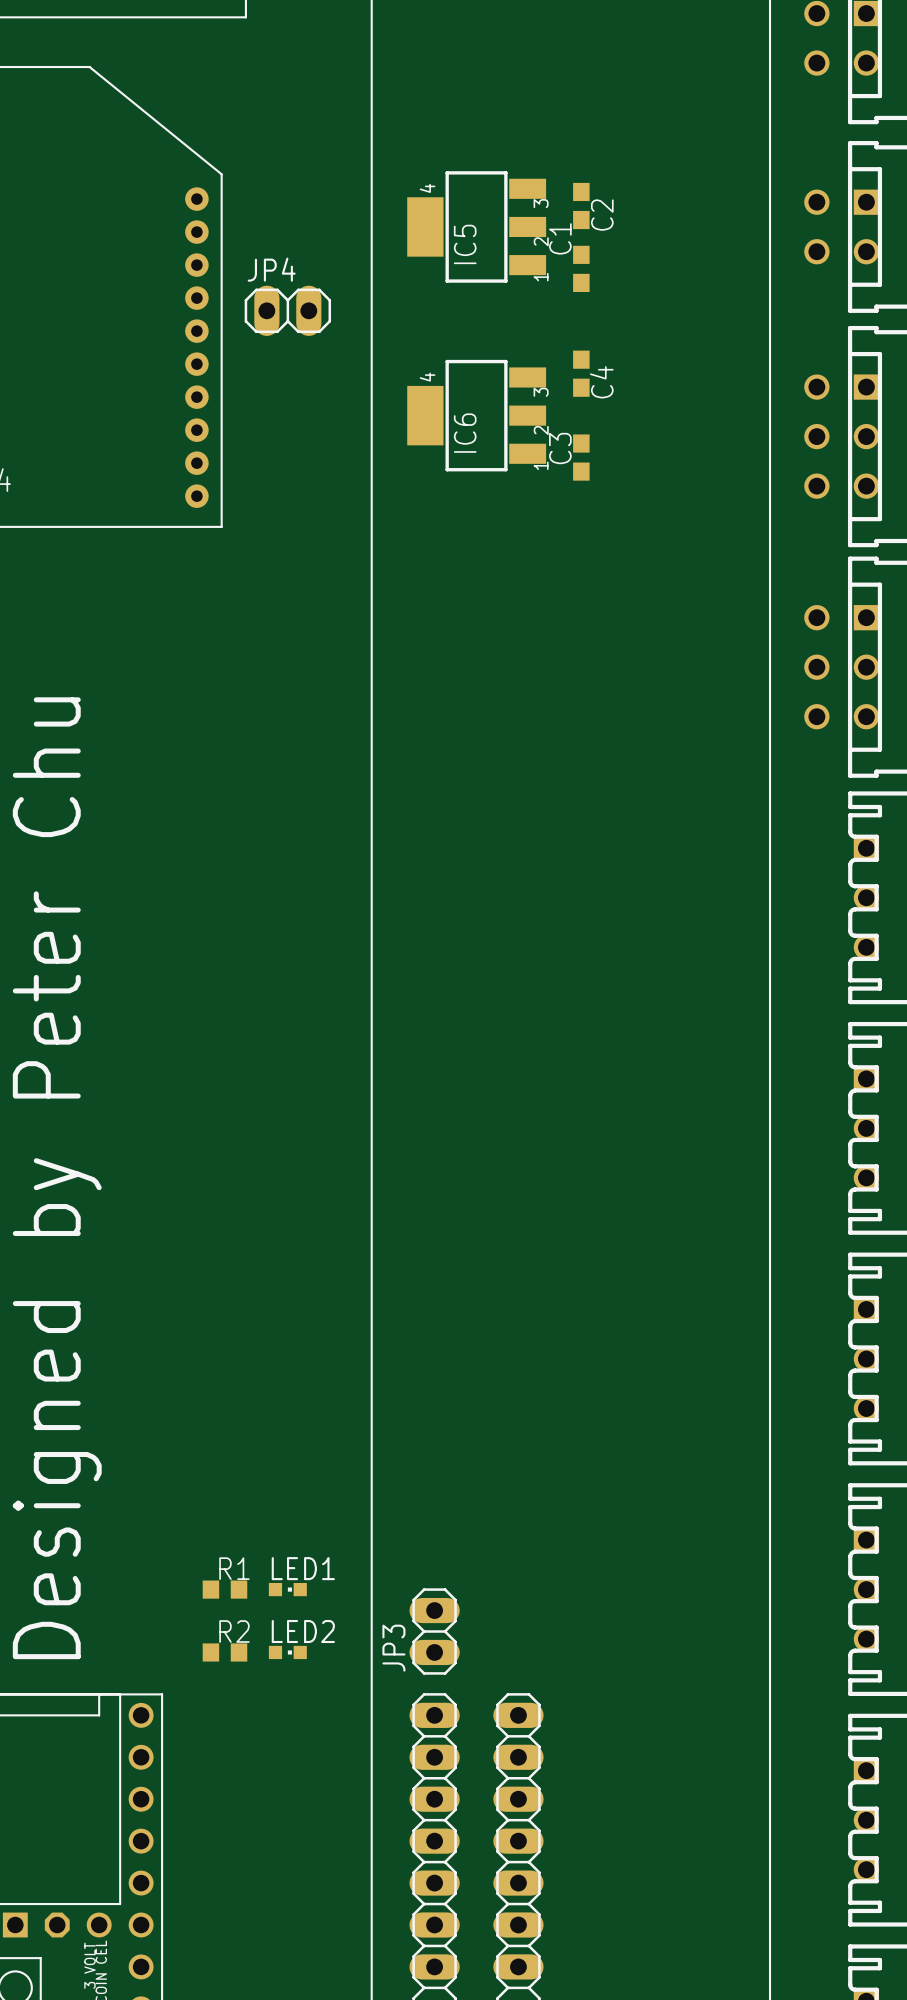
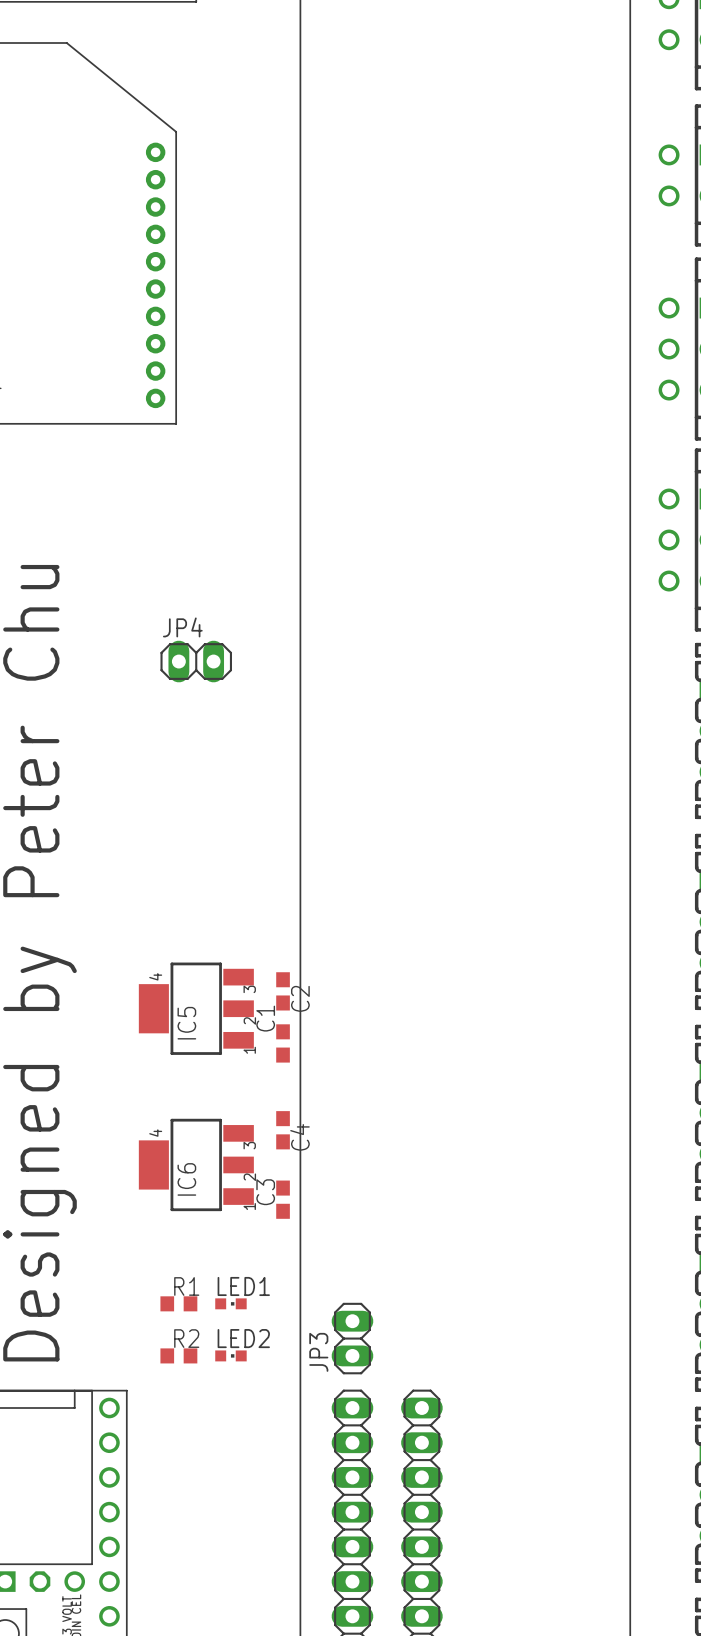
C2 position: (581, 206) -> (283, 991)
IC5 position: (476, 226) -> (196, 1008)
C1 position: (581, 268) -> (283, 1043)
JP4 position: (287, 310) -> (196, 661)
C4 position: (581, 373) -> (283, 1130)
IC6 position: (476, 415) -> (196, 1164)
C3 position: (581, 457) -> (283, 1199)

